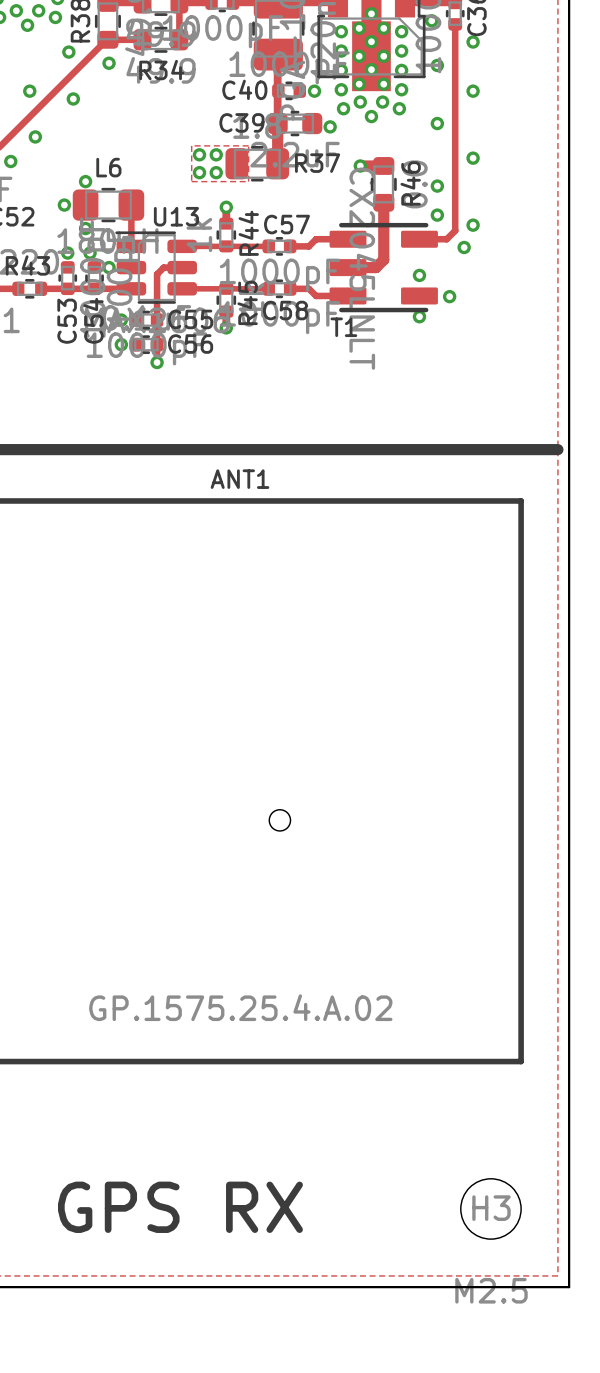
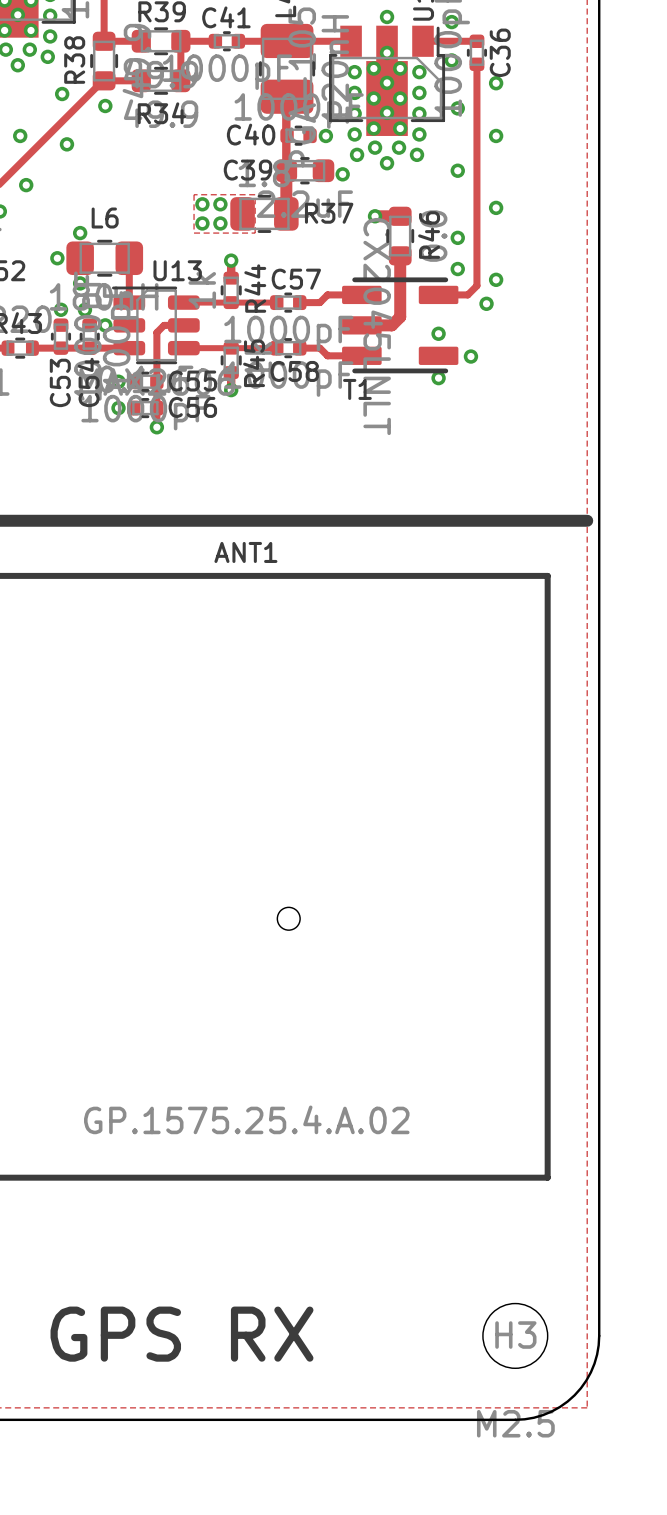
board edge: (569, 1208) (569, 1287) (490, 1287) -> (599, 1335) (594, 1363) (586, 1380) (574, 1395) (551, 1411) (533, 1417) (515, 1419)

